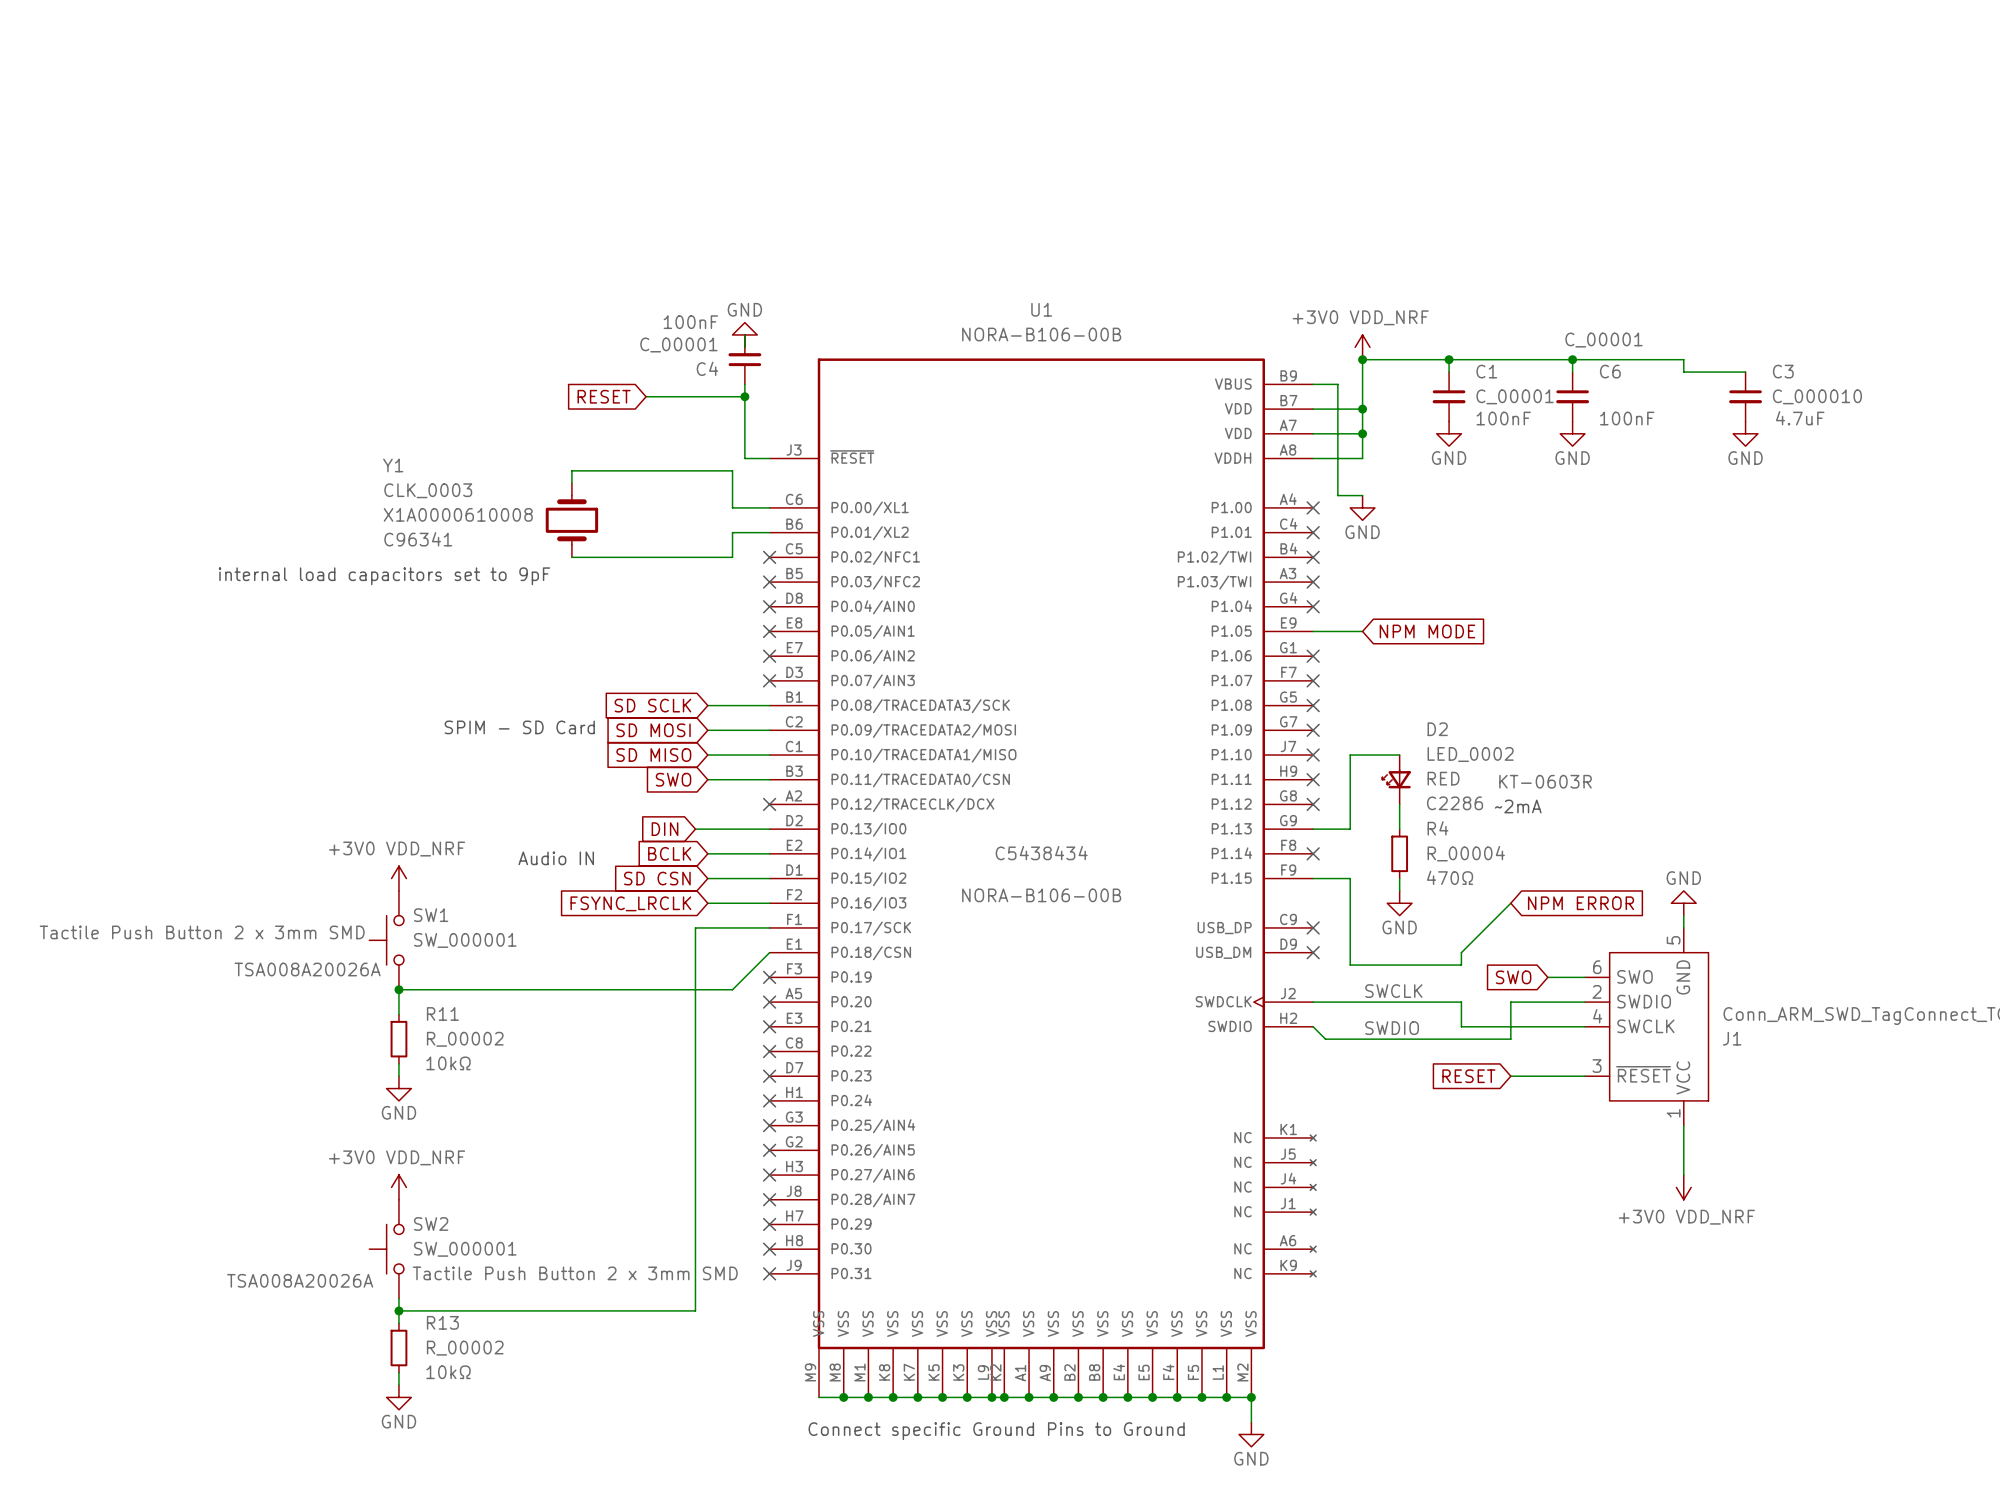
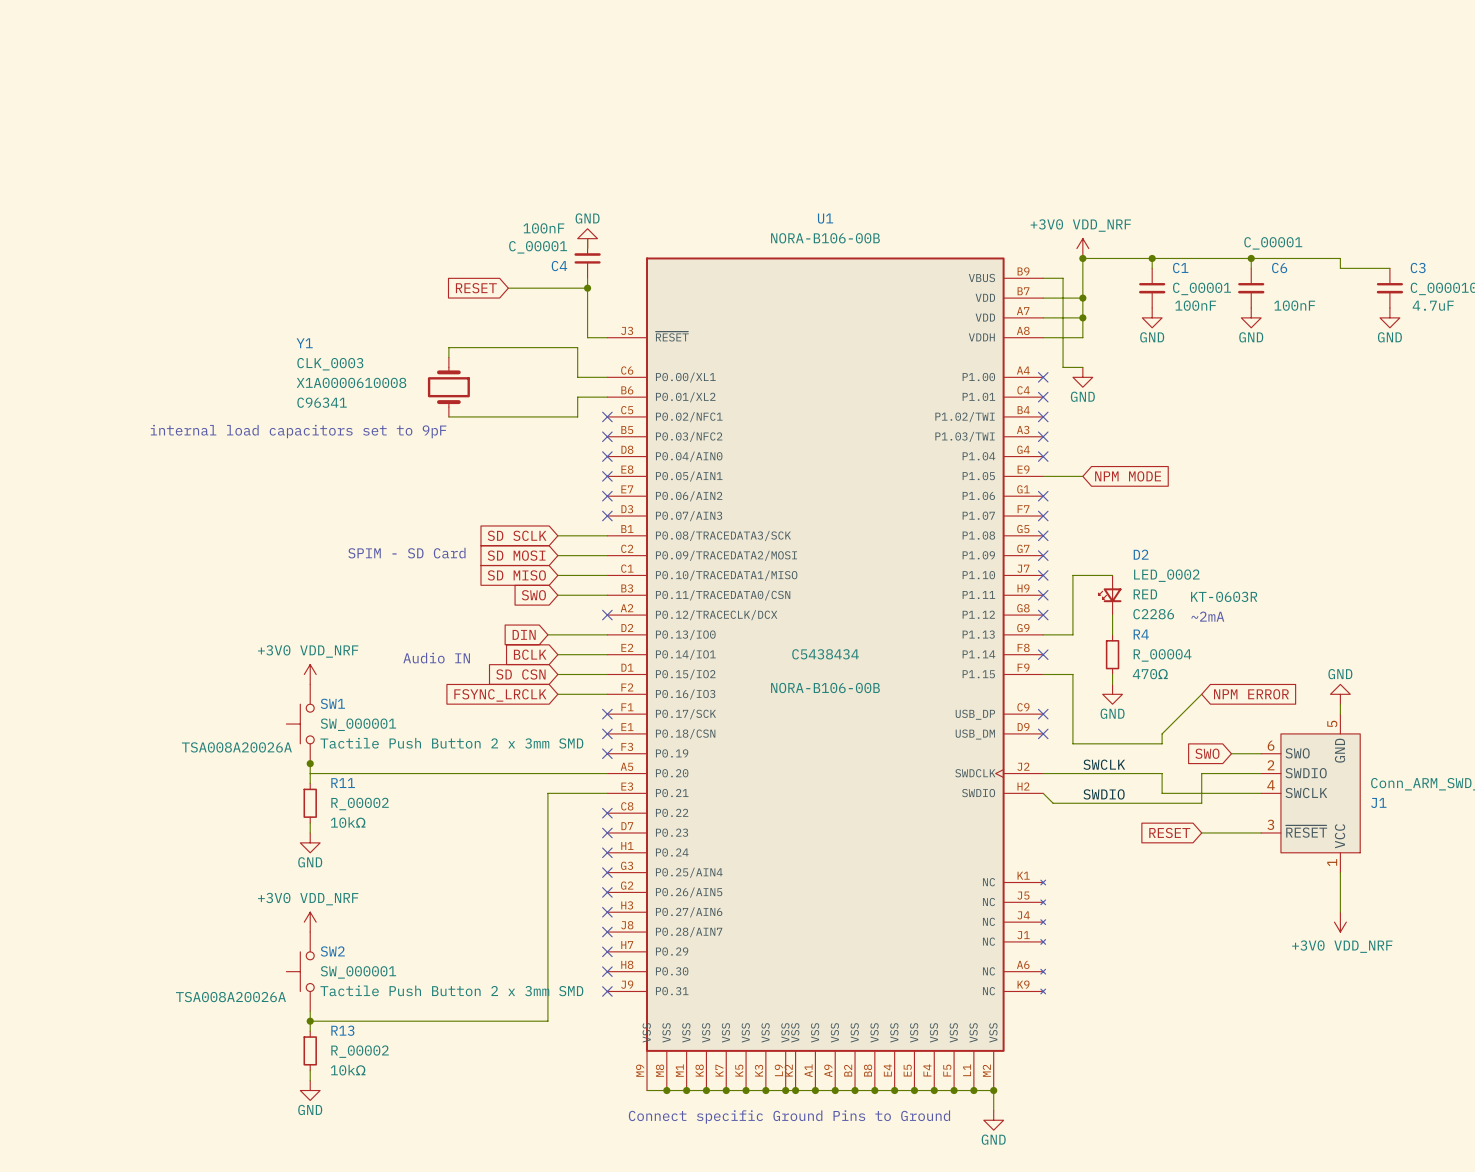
wire: (769, 927) (695, 927) (695, 1026) -> (607, 793) (547, 793)
no-connect mark: none -> (607, 714)
SW1 text position: Tactile Push Button 2 x 3mm SMD (202, 932) -> Tactile Push Button 2 x 3mm SMD (451, 743)
wire: (769, 952) (732, 989) (398, 989) -> none
no-connect mark: none -> (607, 733)
wire: none -> (310, 773) (607, 773)
no-connect mark: (769, 1002) -> none
no-connect mark: (769, 1026) -> none

